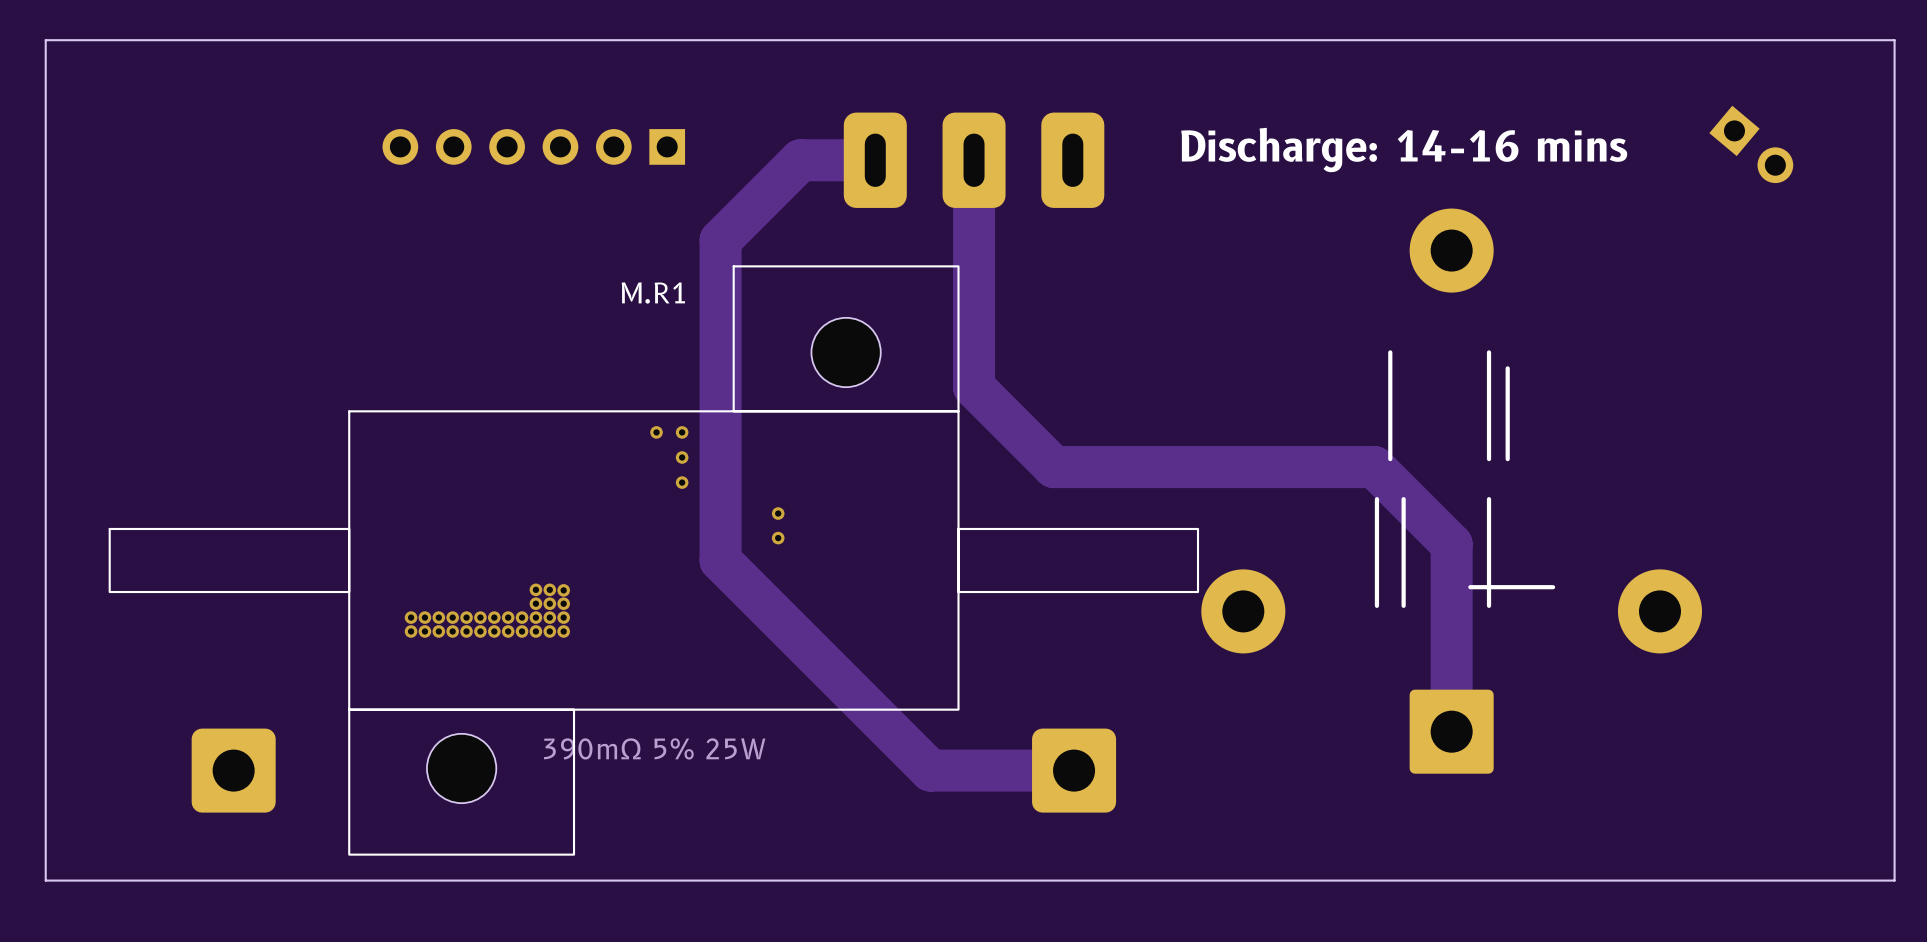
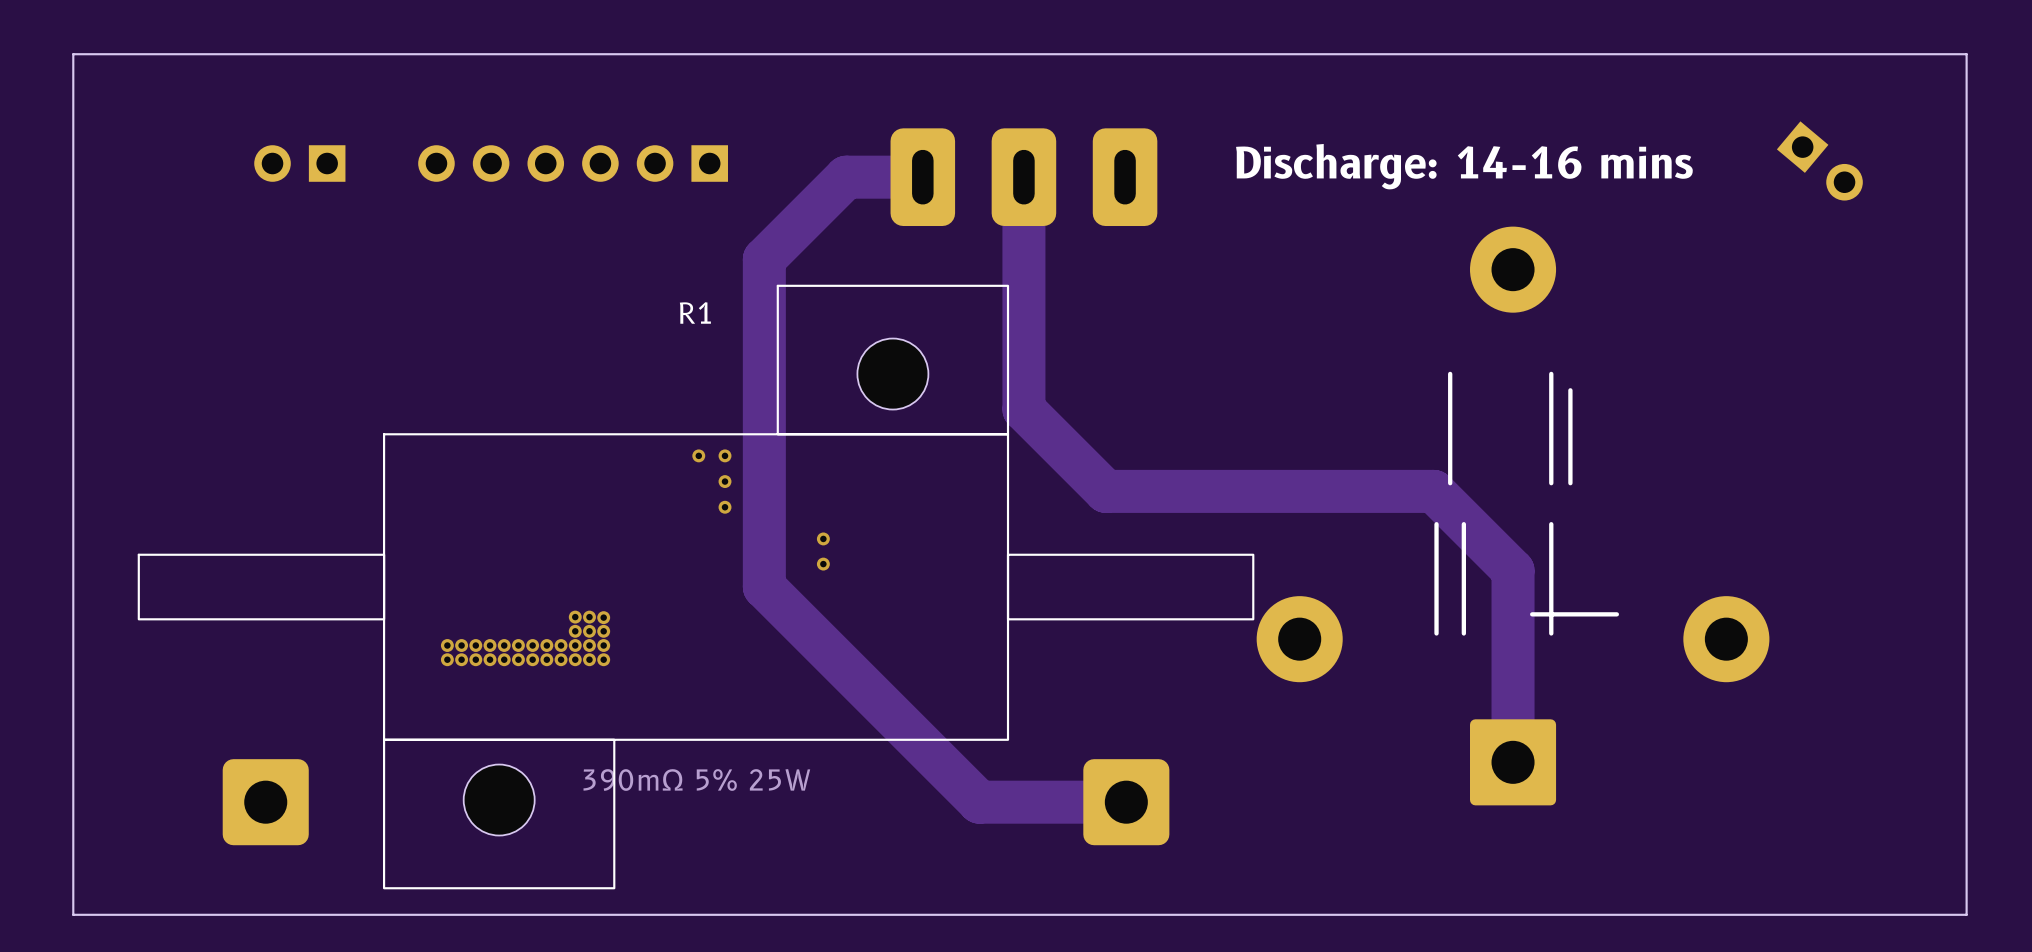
part: none -> (299, 163)
M.R1 name: M.R1 (653, 293) -> R1 (695, 312)

